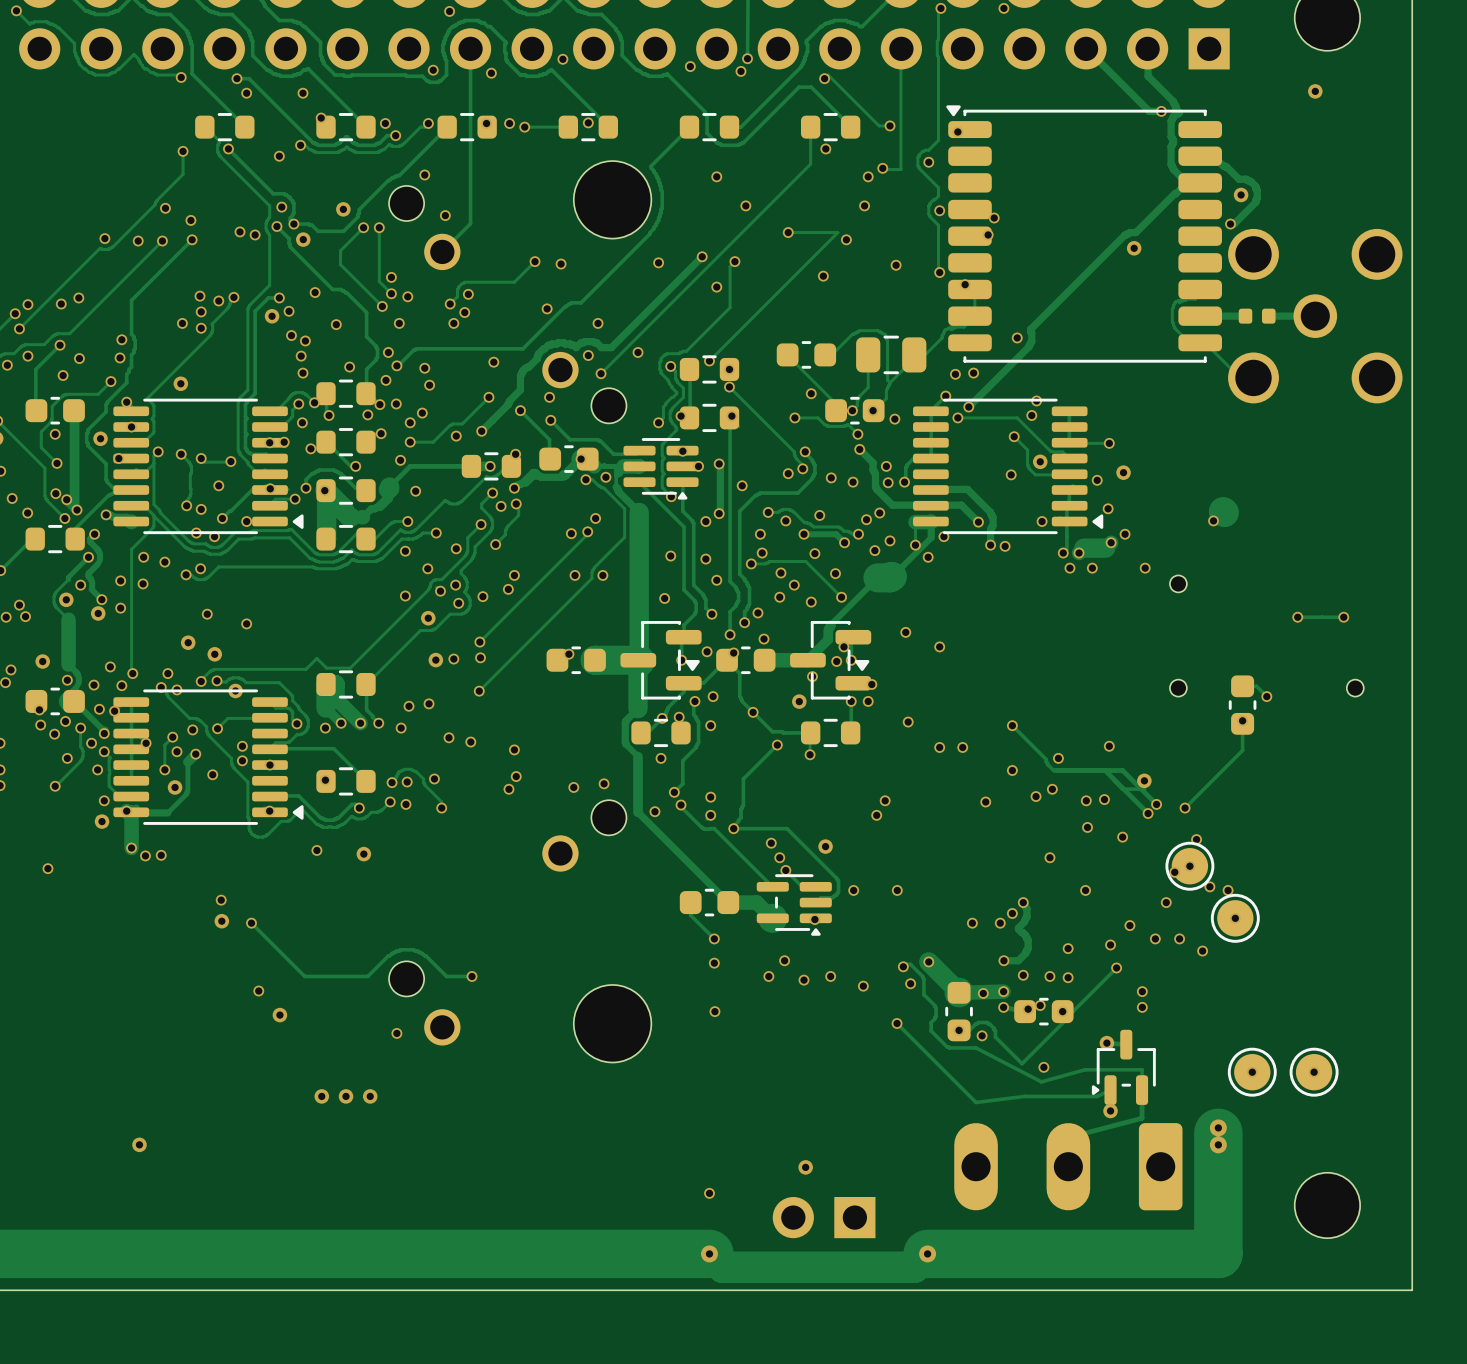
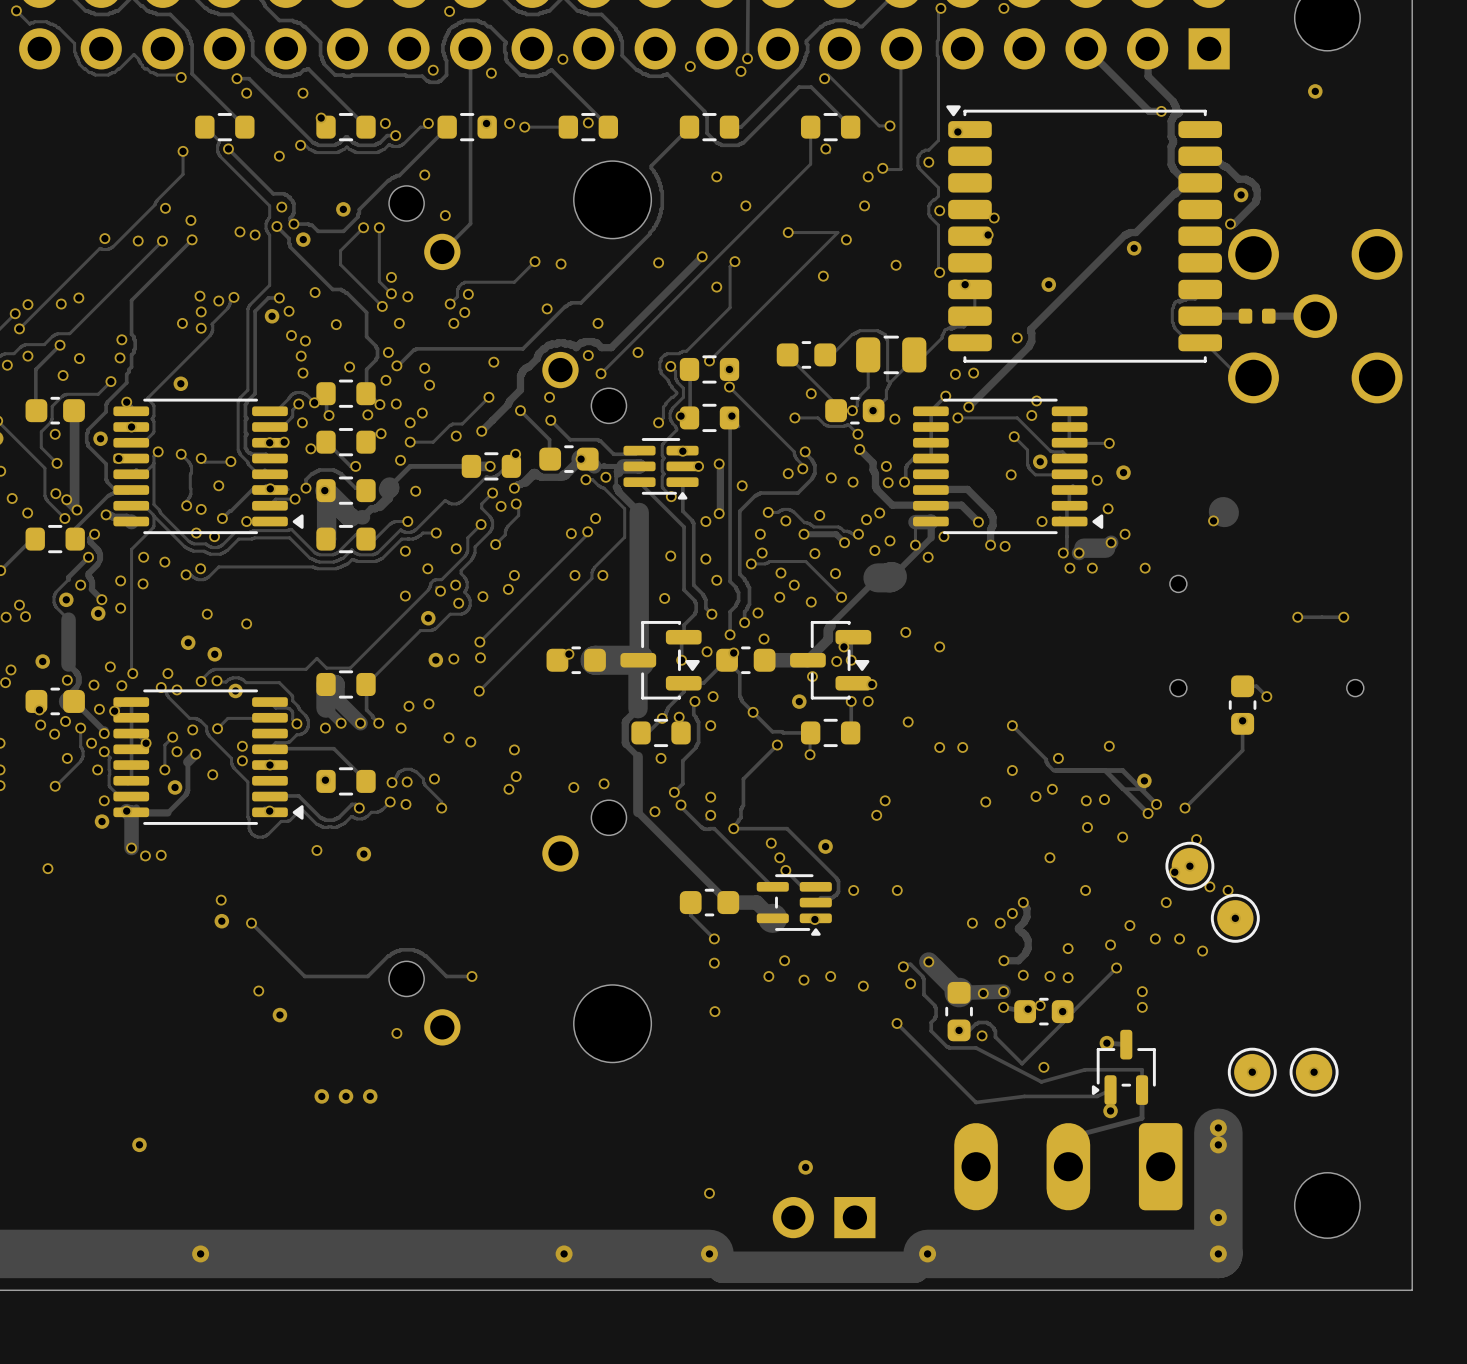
via: none -> (1048, 284)
via: none -> (1218, 1217)
via: none -> (200, 1253)
via: none -> (564, 1253)
via: none -> (1218, 1253)

